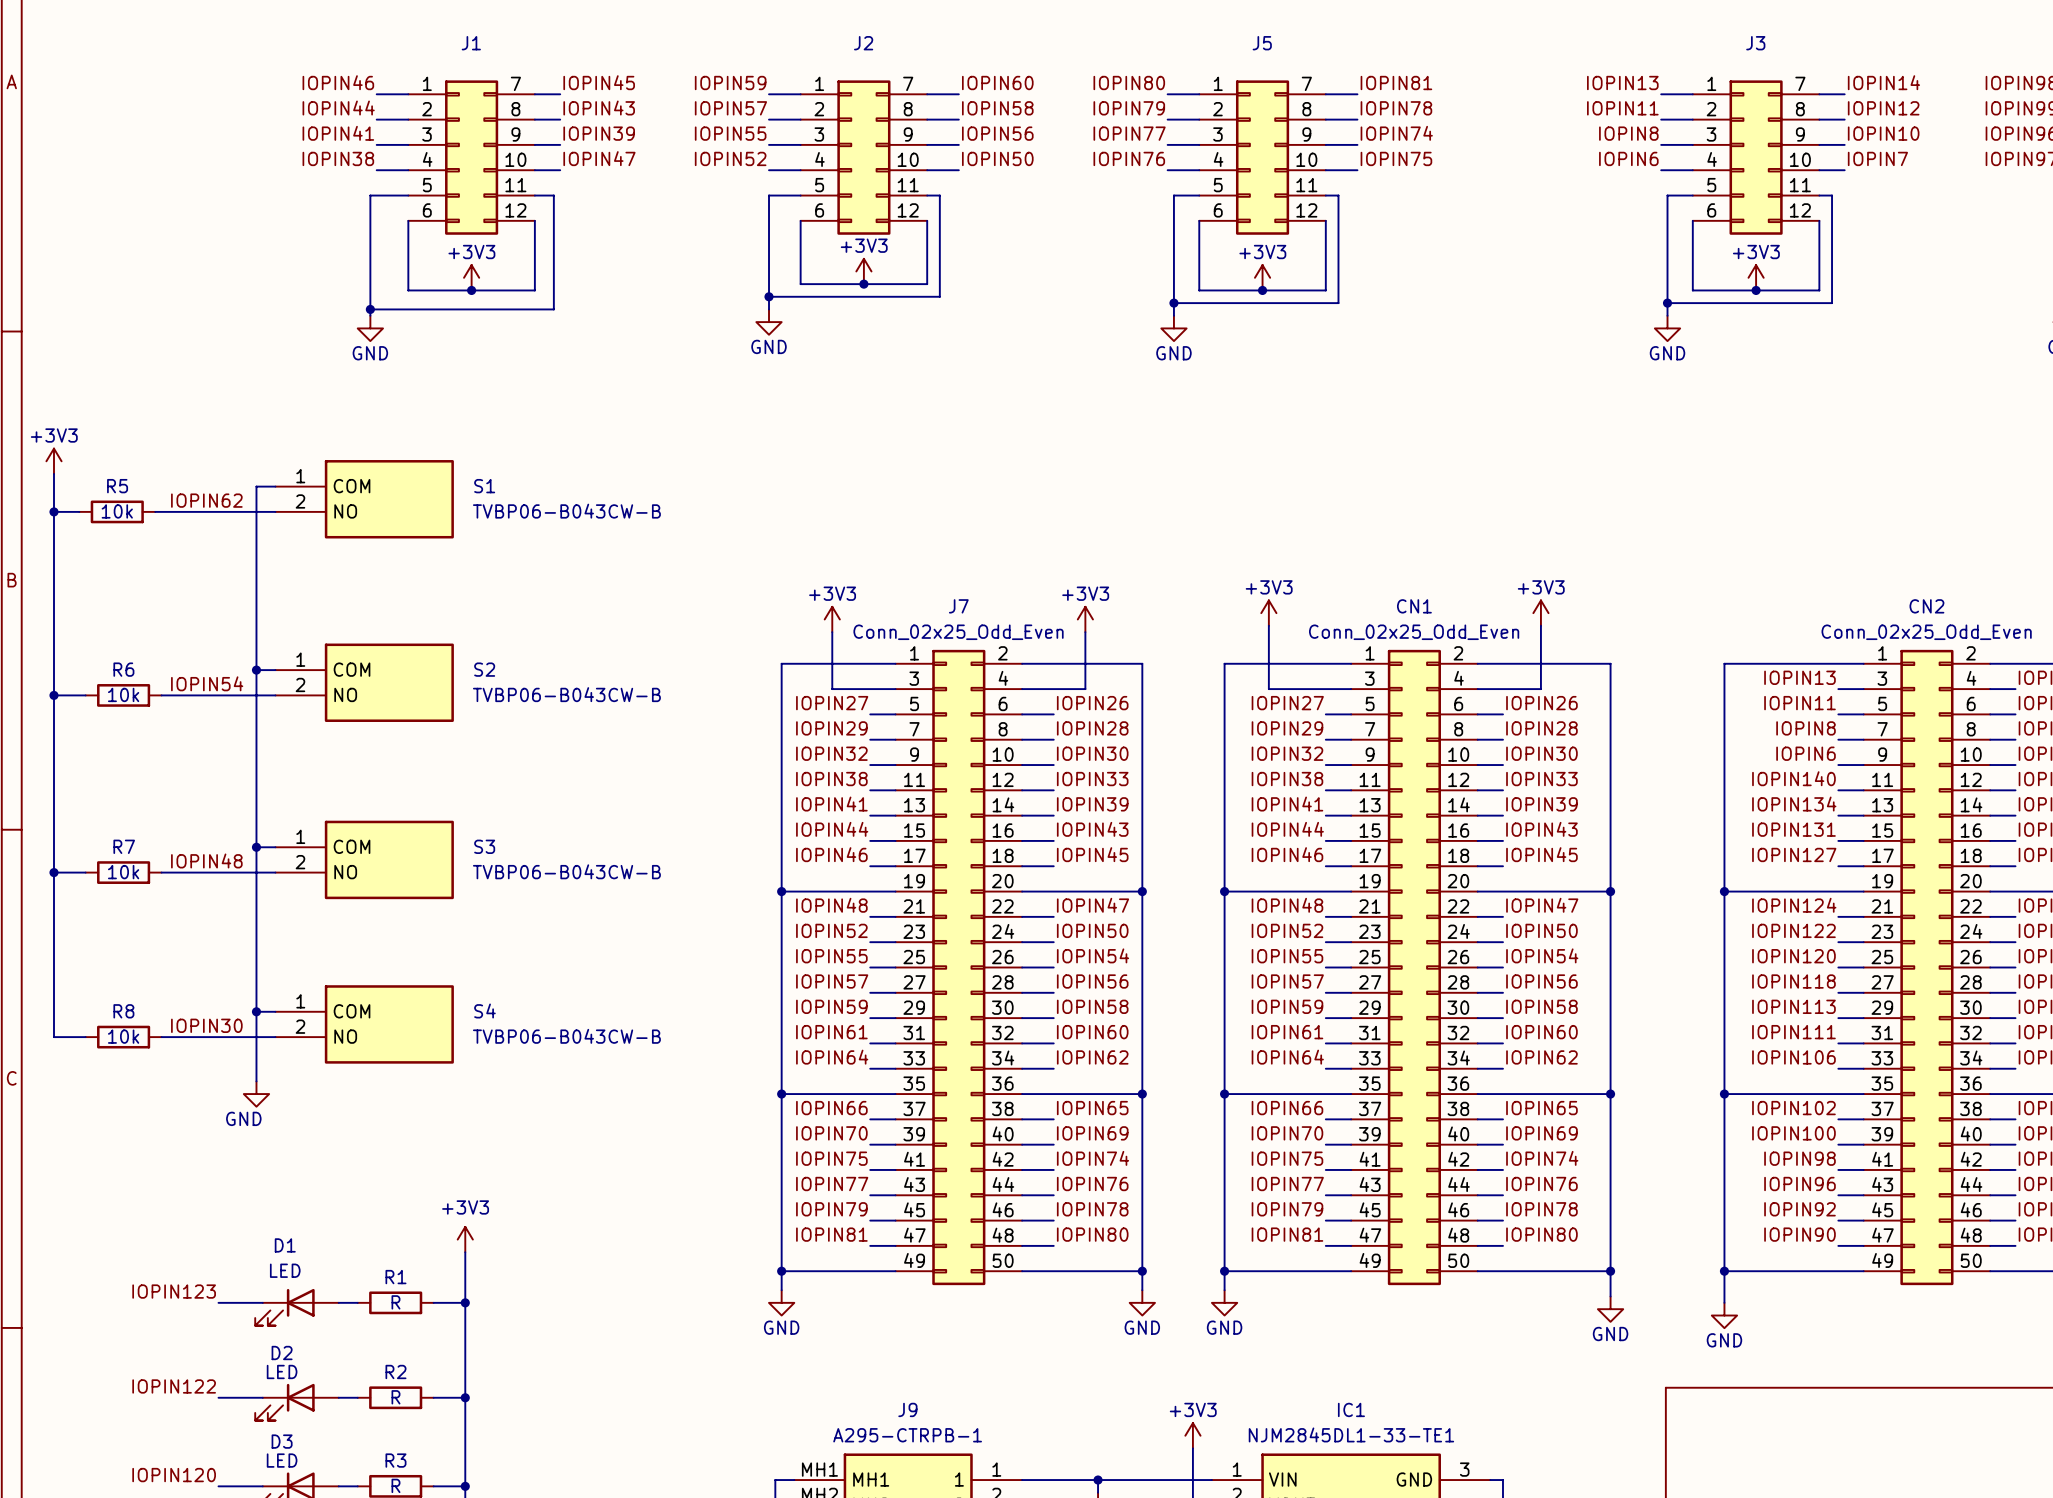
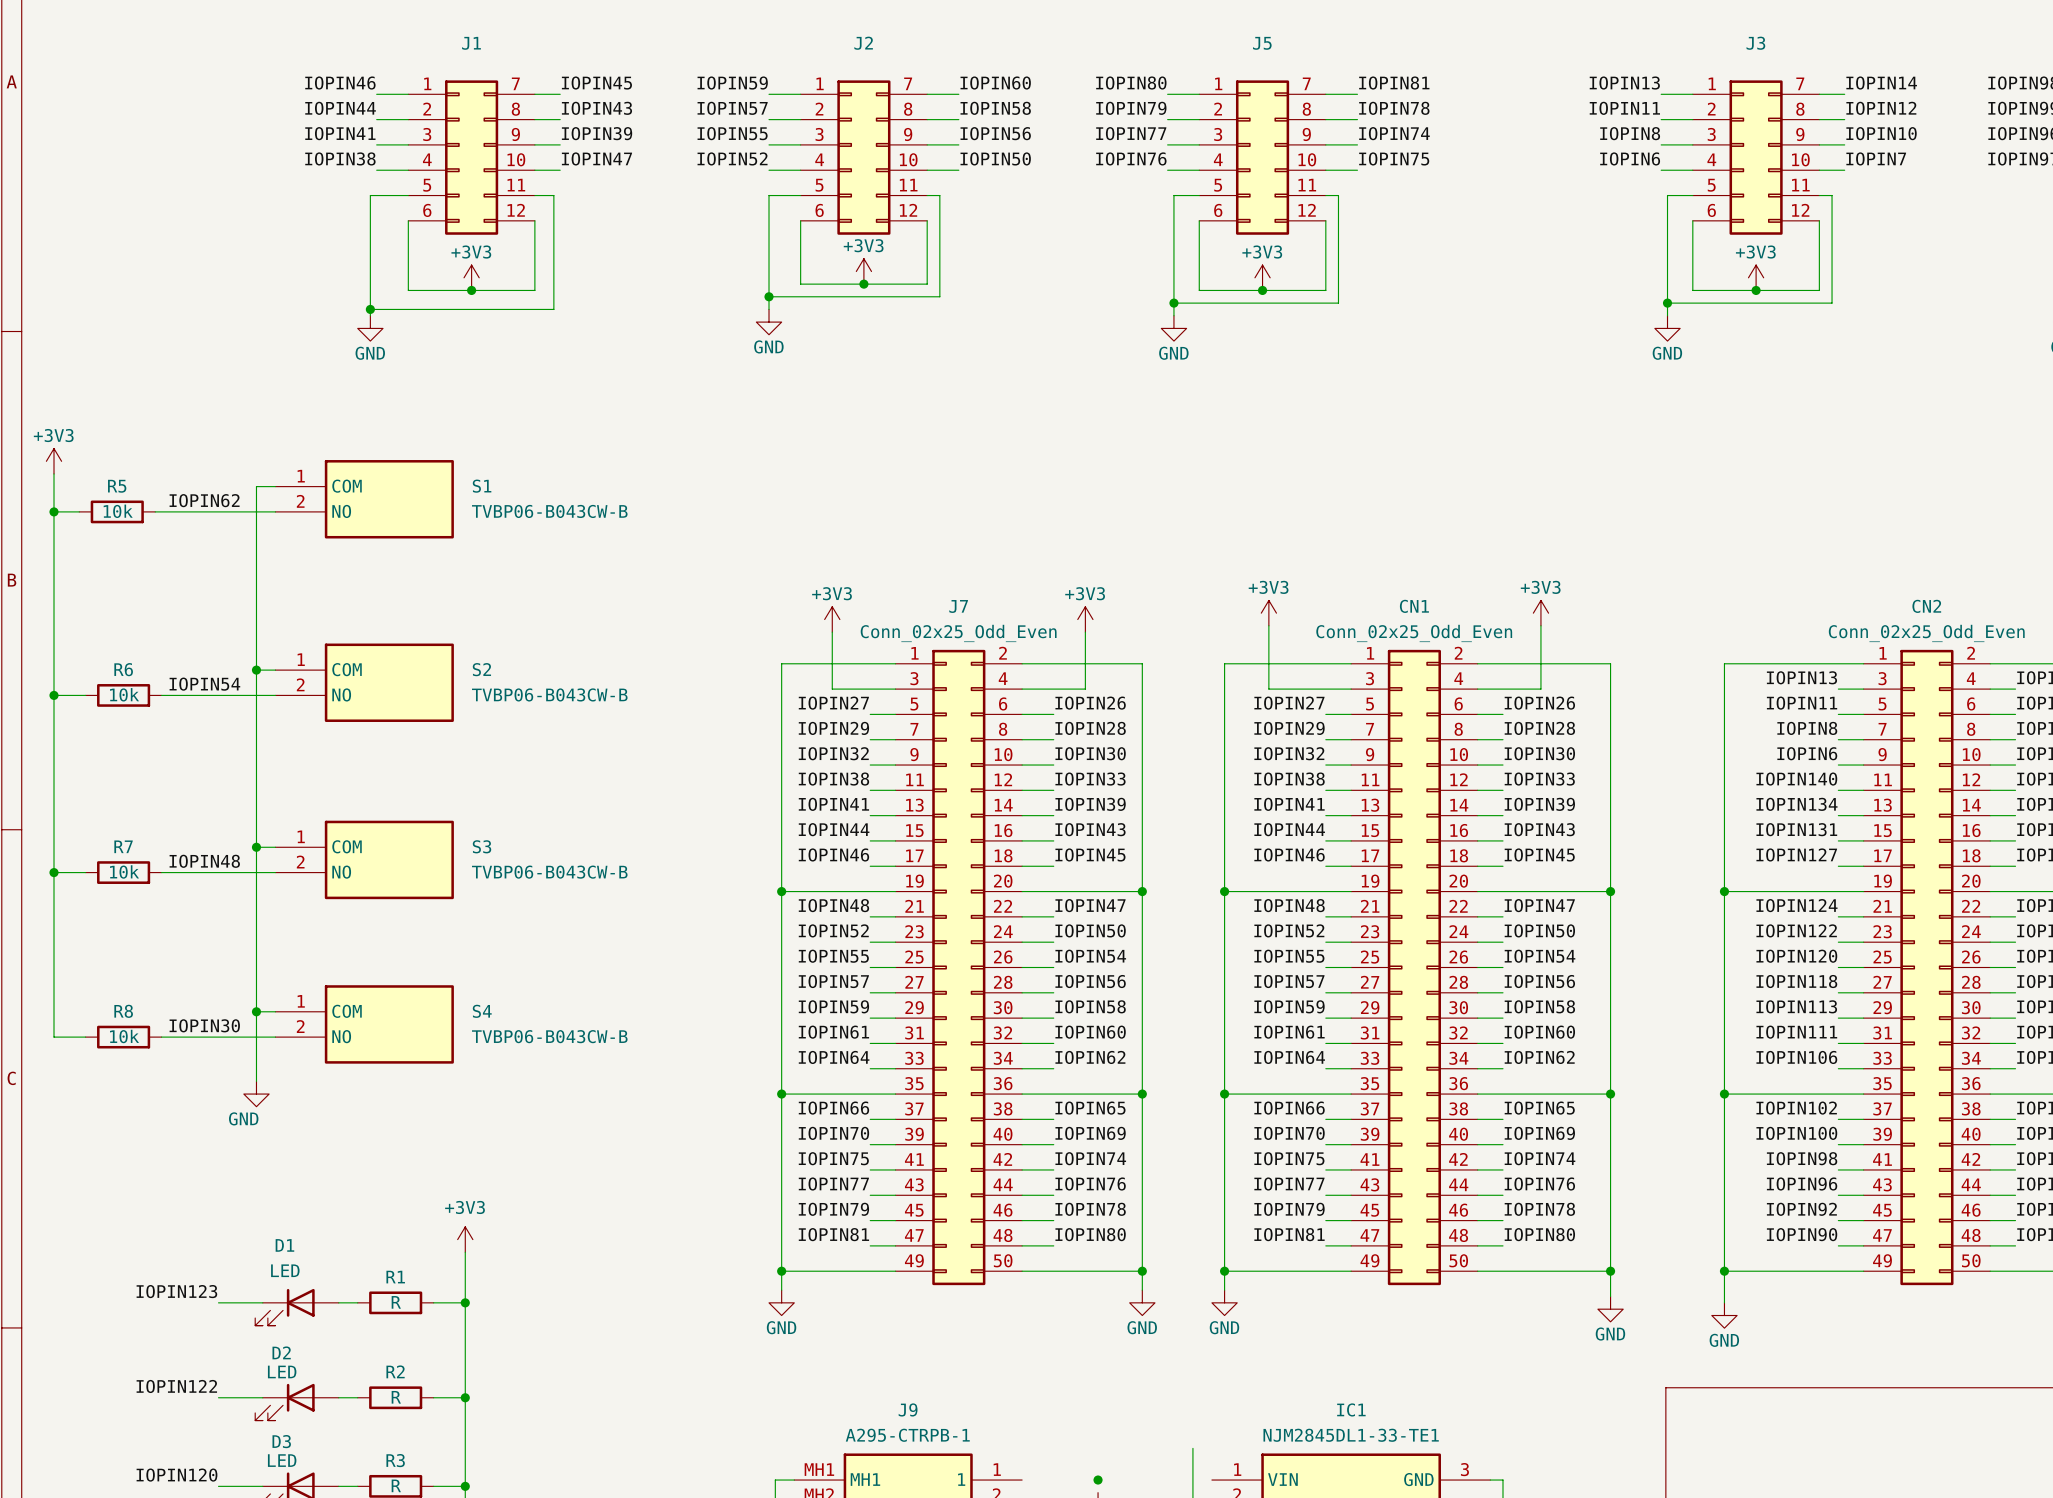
power symbol: +3V3 (1192, 1435) -> none
wire: (1022, 1480) (1211, 1480) -> none
wire: (1098, 1480) (1098, 1492) -> none

